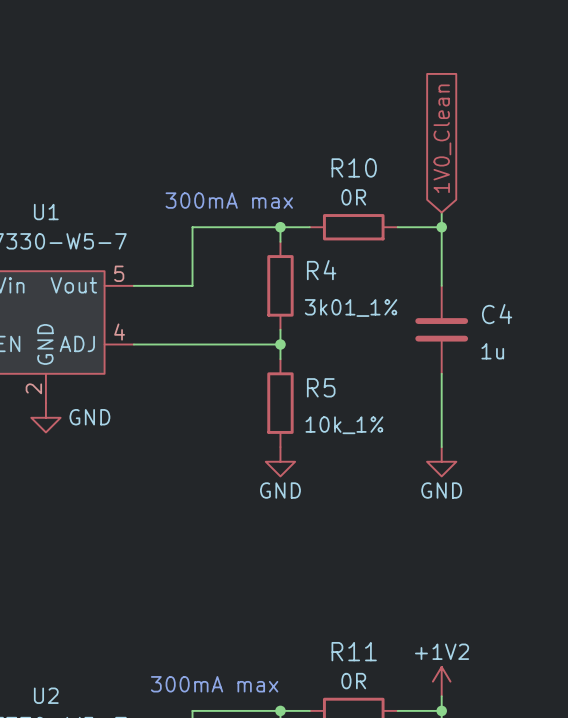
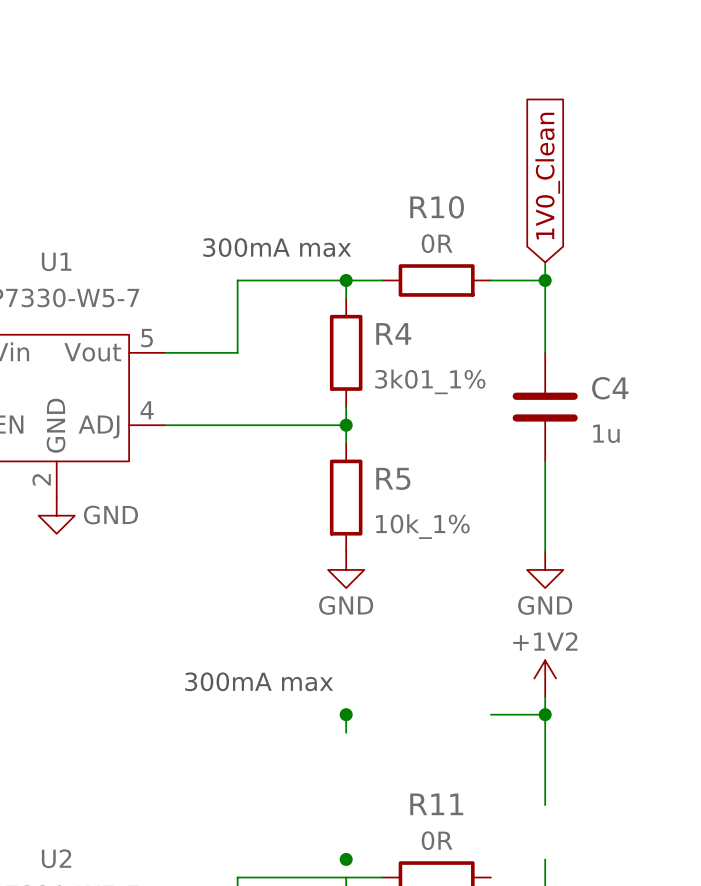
text: none -> 300mA max (259, 681)
wire: none -> (545, 696) (545, 805)
wire: none -> (346, 714) (346, 732)
junction: none -> (346, 714)
junction: none -> (545, 714)
power symbol position: +1V2 (441, 681) -> +1V2 (545, 678)
text: 300mA max (214, 684) -> none
junction position: (280, 710) -> (346, 859)
wire: (397, 710) (441, 710) -> (490, 714) (545, 714)
junction: (441, 710) -> none

